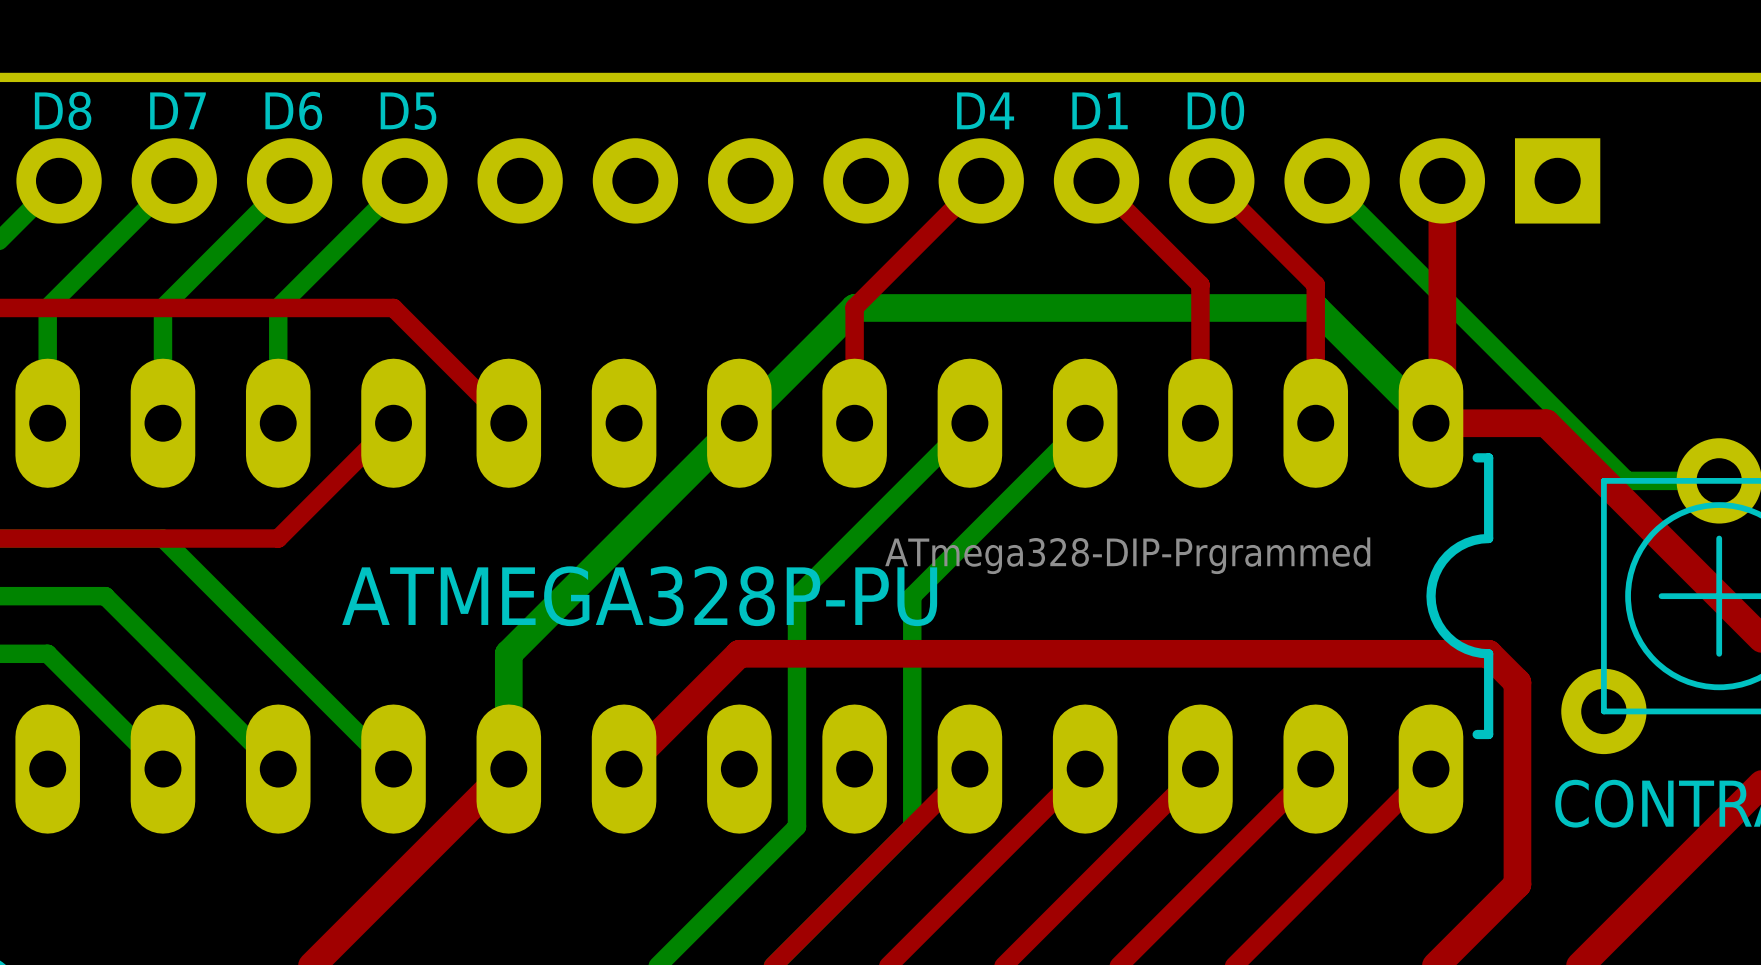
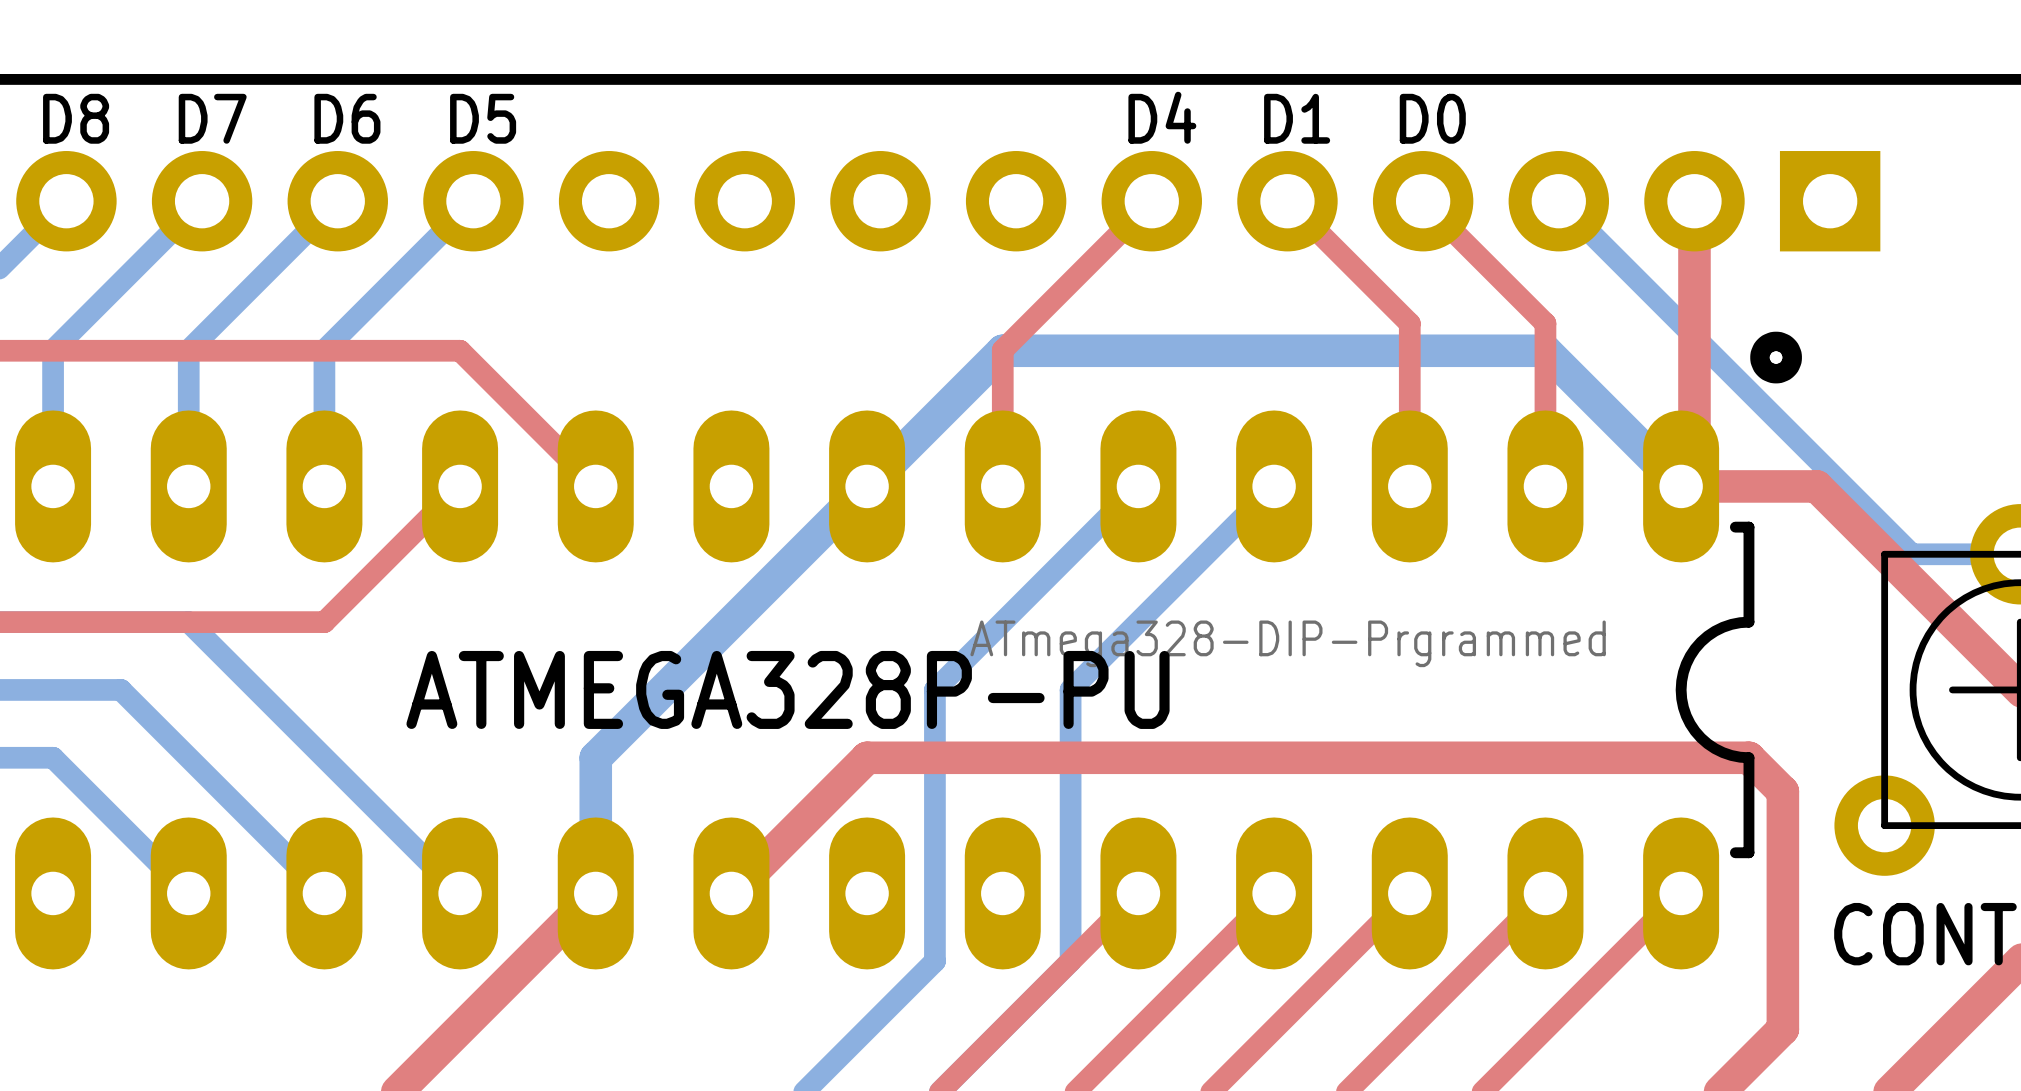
drawing: none -> [1750, 331, 1802, 384]

